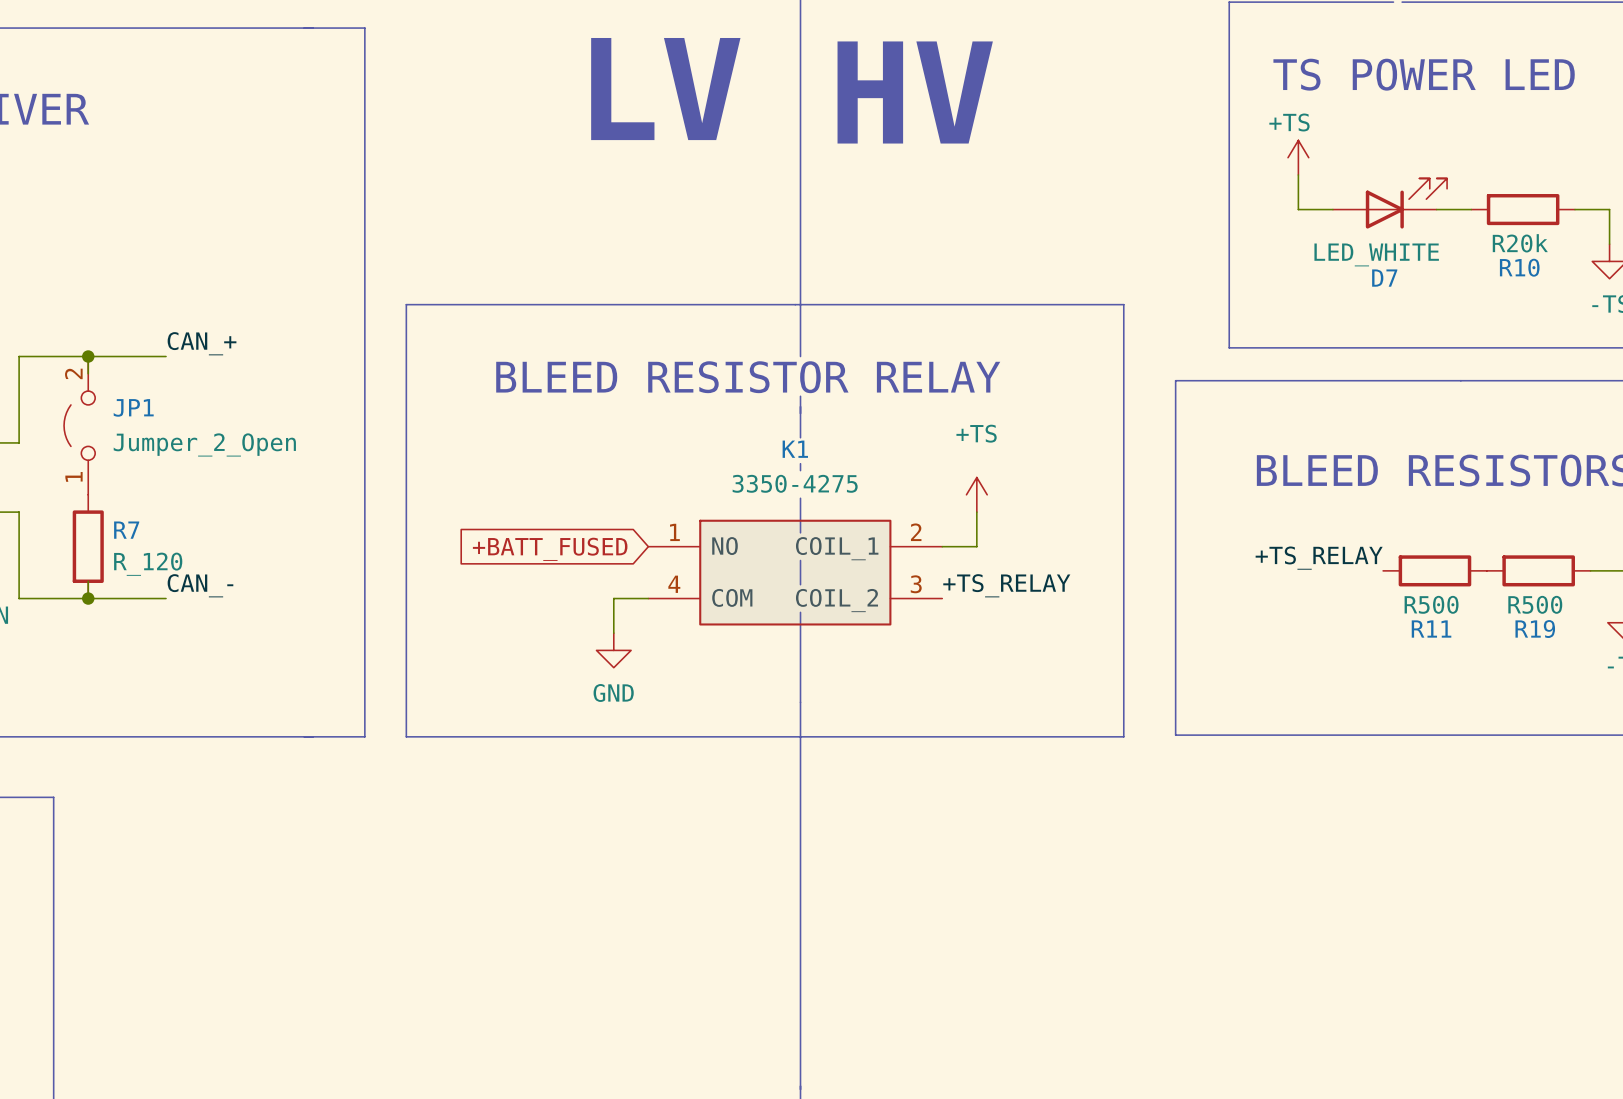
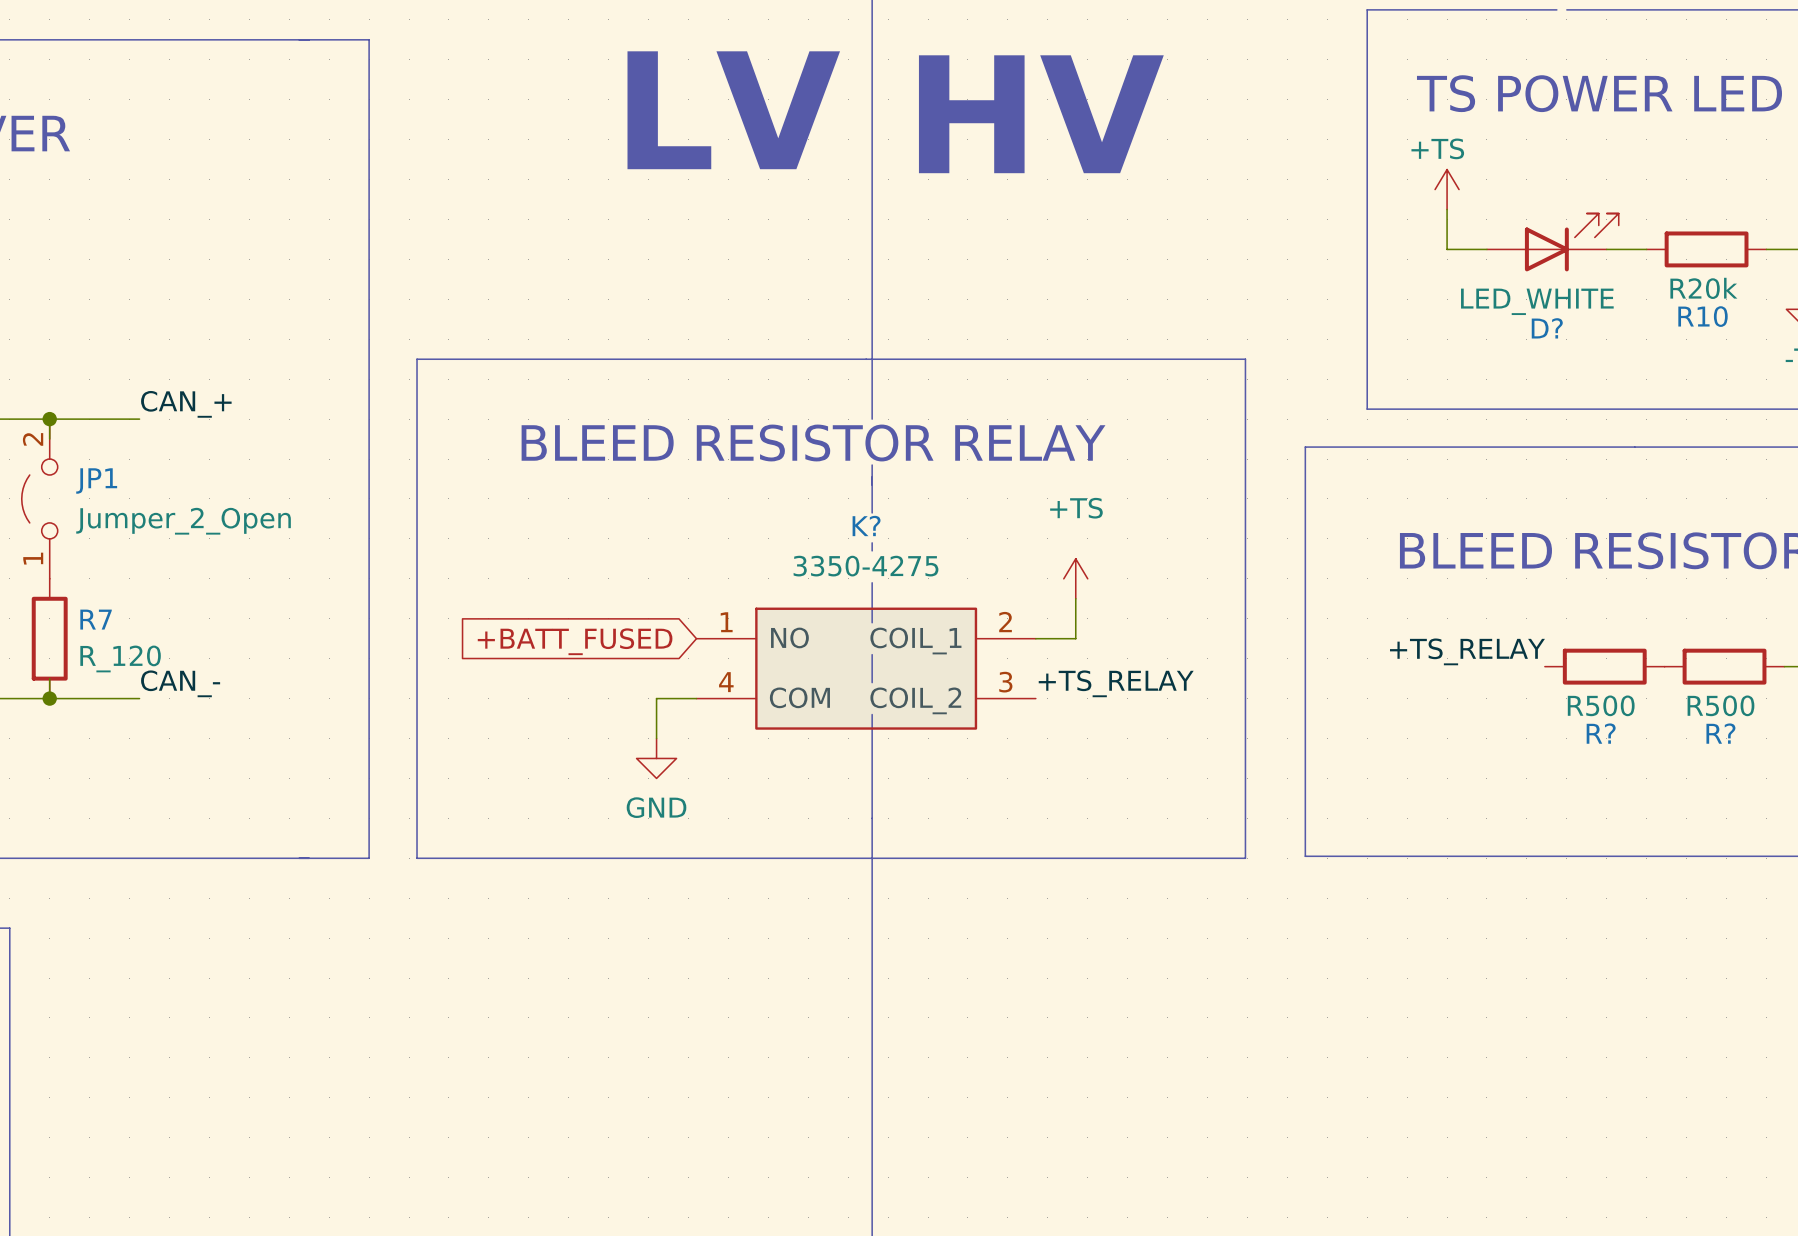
D7 name: D7 (1384, 278) -> D? (1547, 328)
K1 name: K1 (795, 449) -> K? (866, 525)
R11 name: R11 (1431, 629) -> R? (1601, 733)
R19 name: R19 (1535, 629) -> R? (1720, 733)

